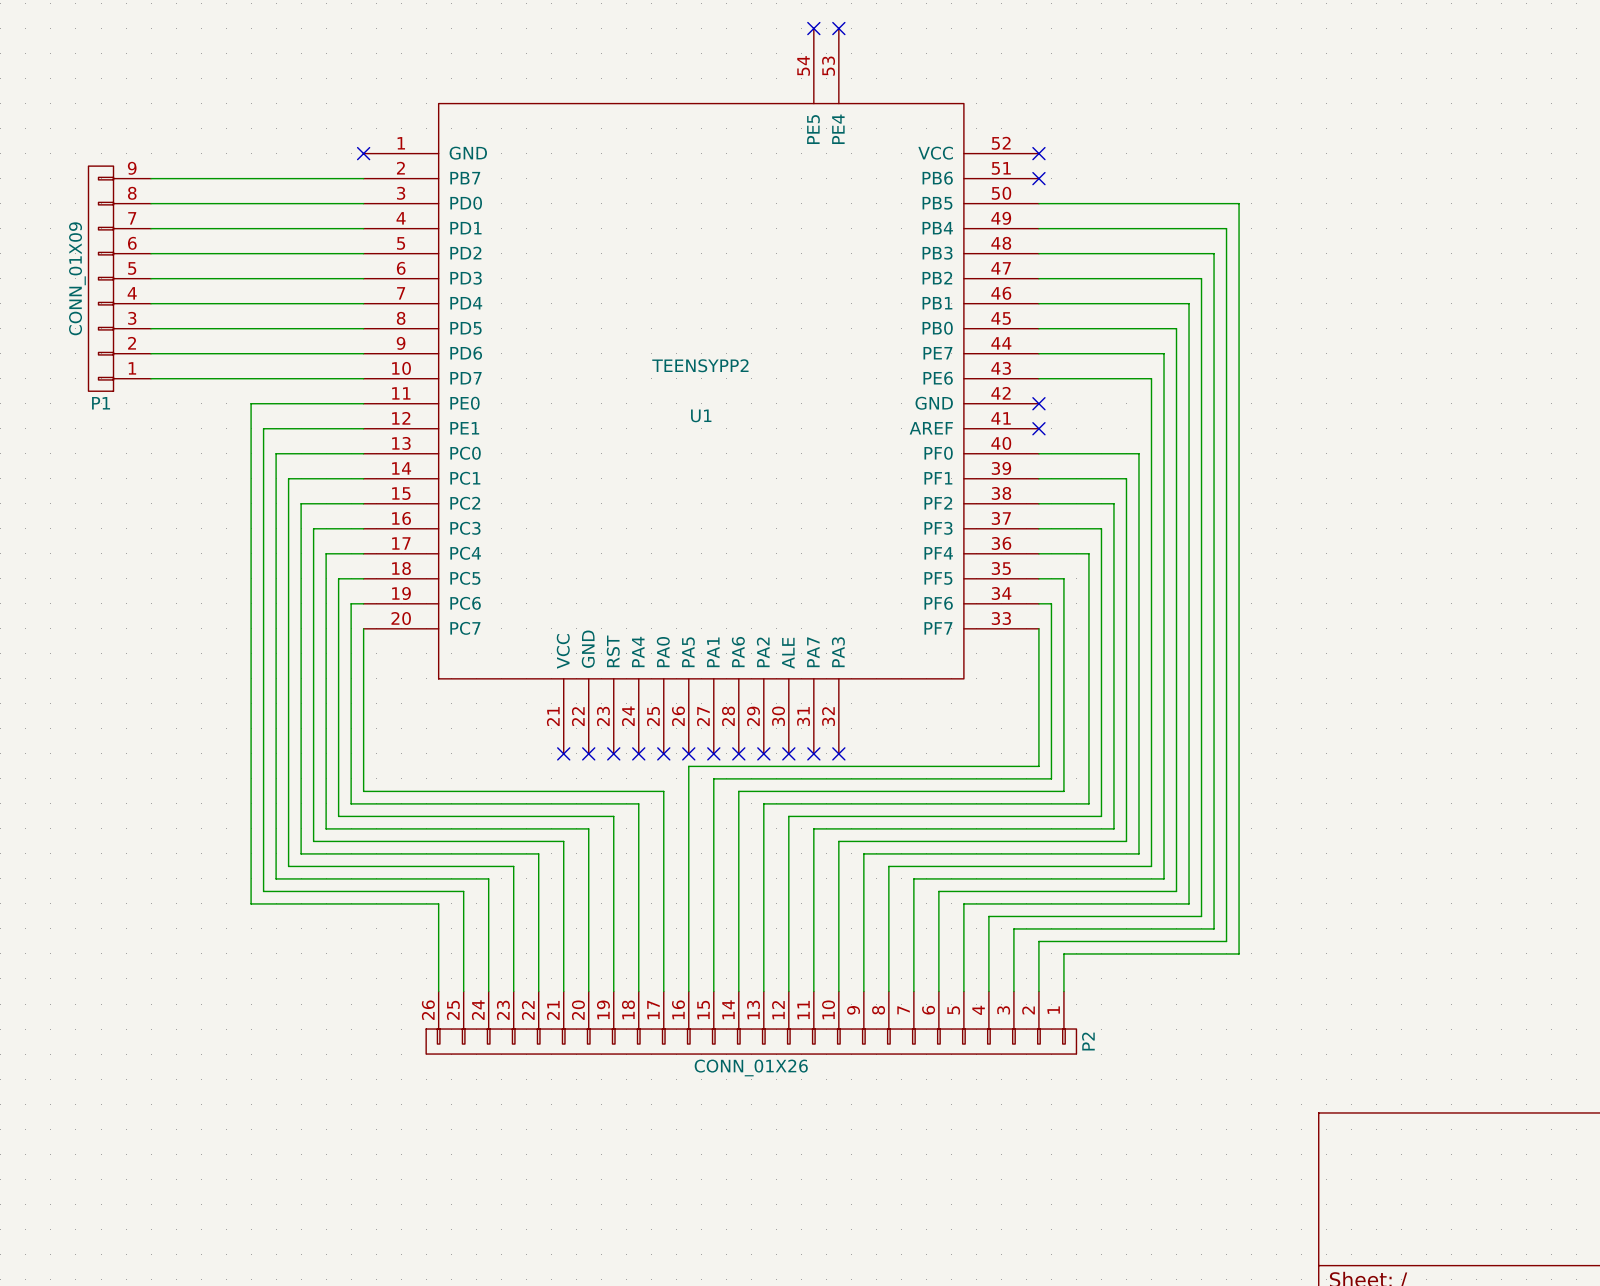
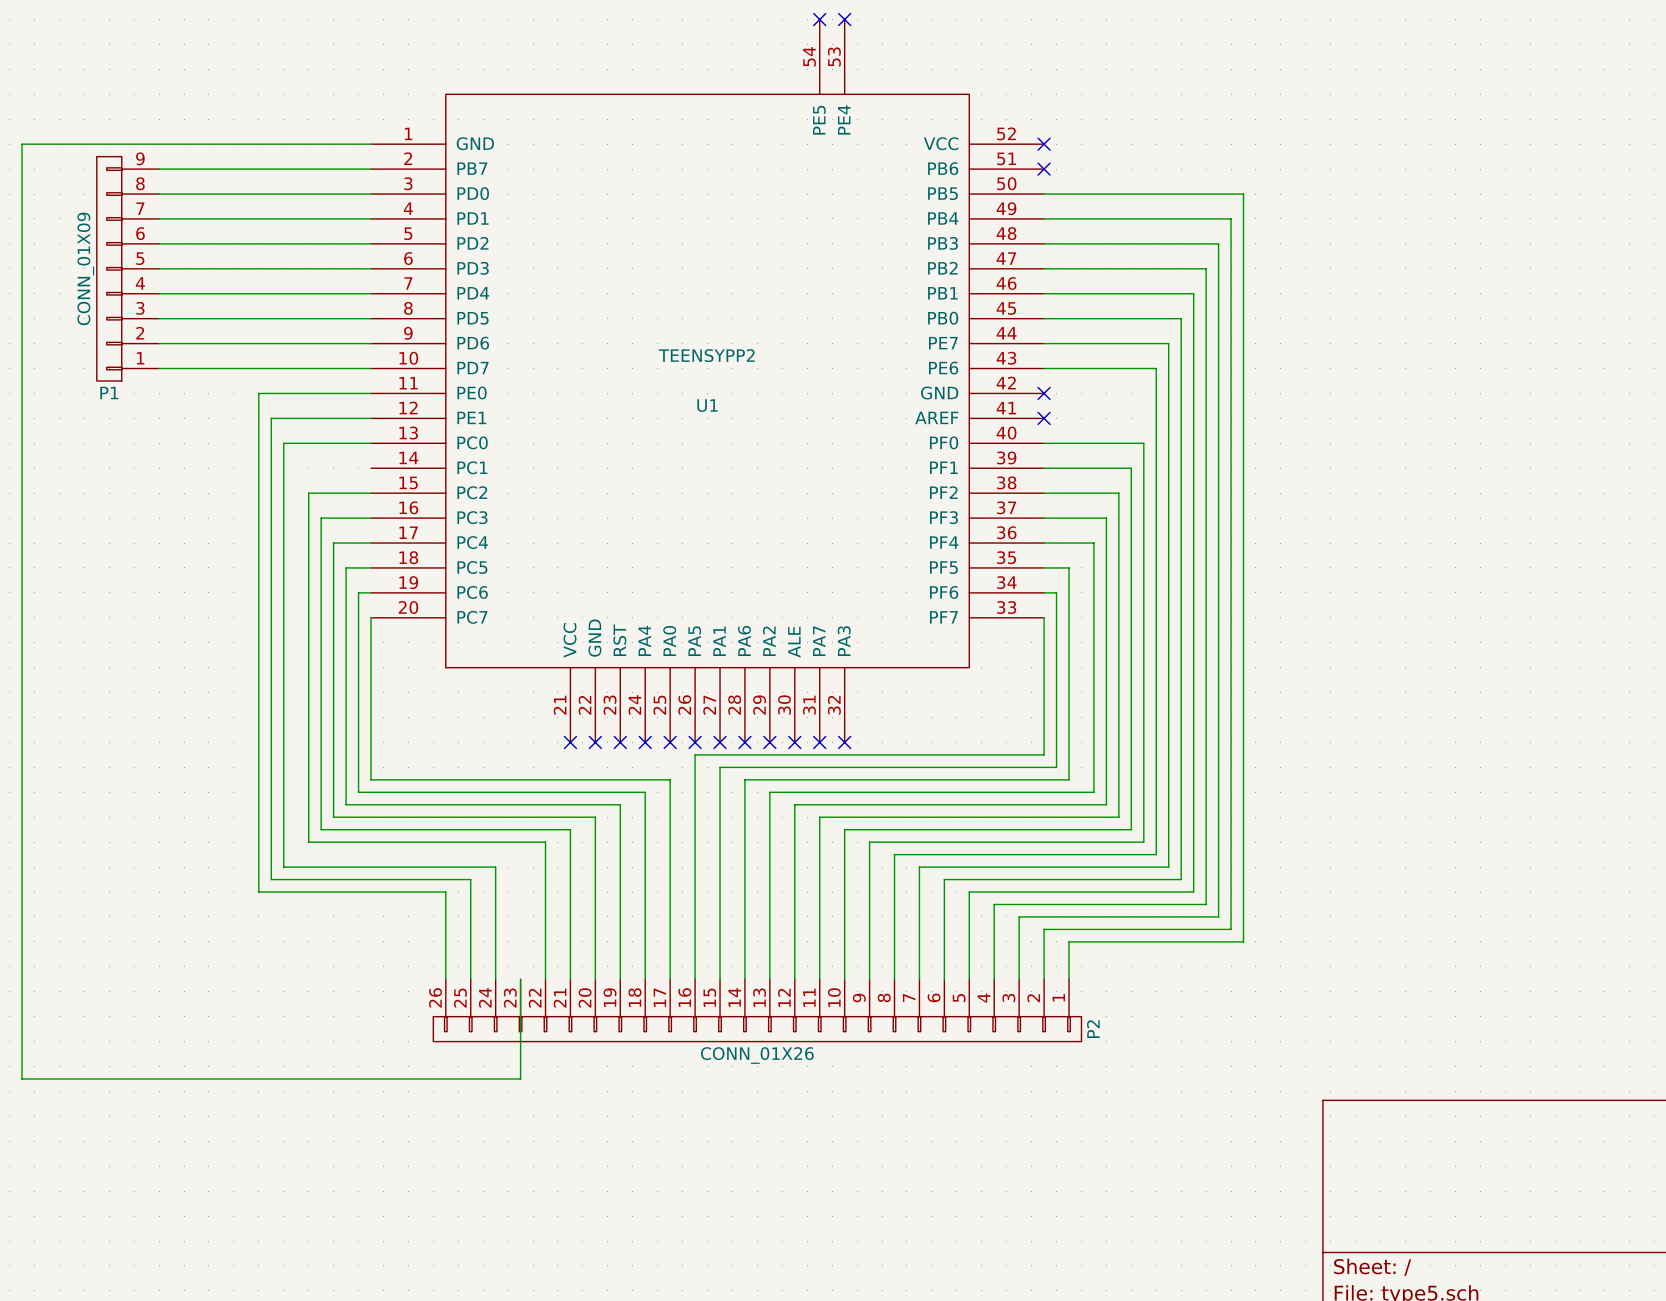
no-connect mark: (363, 153) -> none
wire: (363, 478) (288, 478) (288, 866) (513, 866) (513, 991) -> (371, 144) (22, 144) (22, 1078) (520, 1078) (520, 979)

